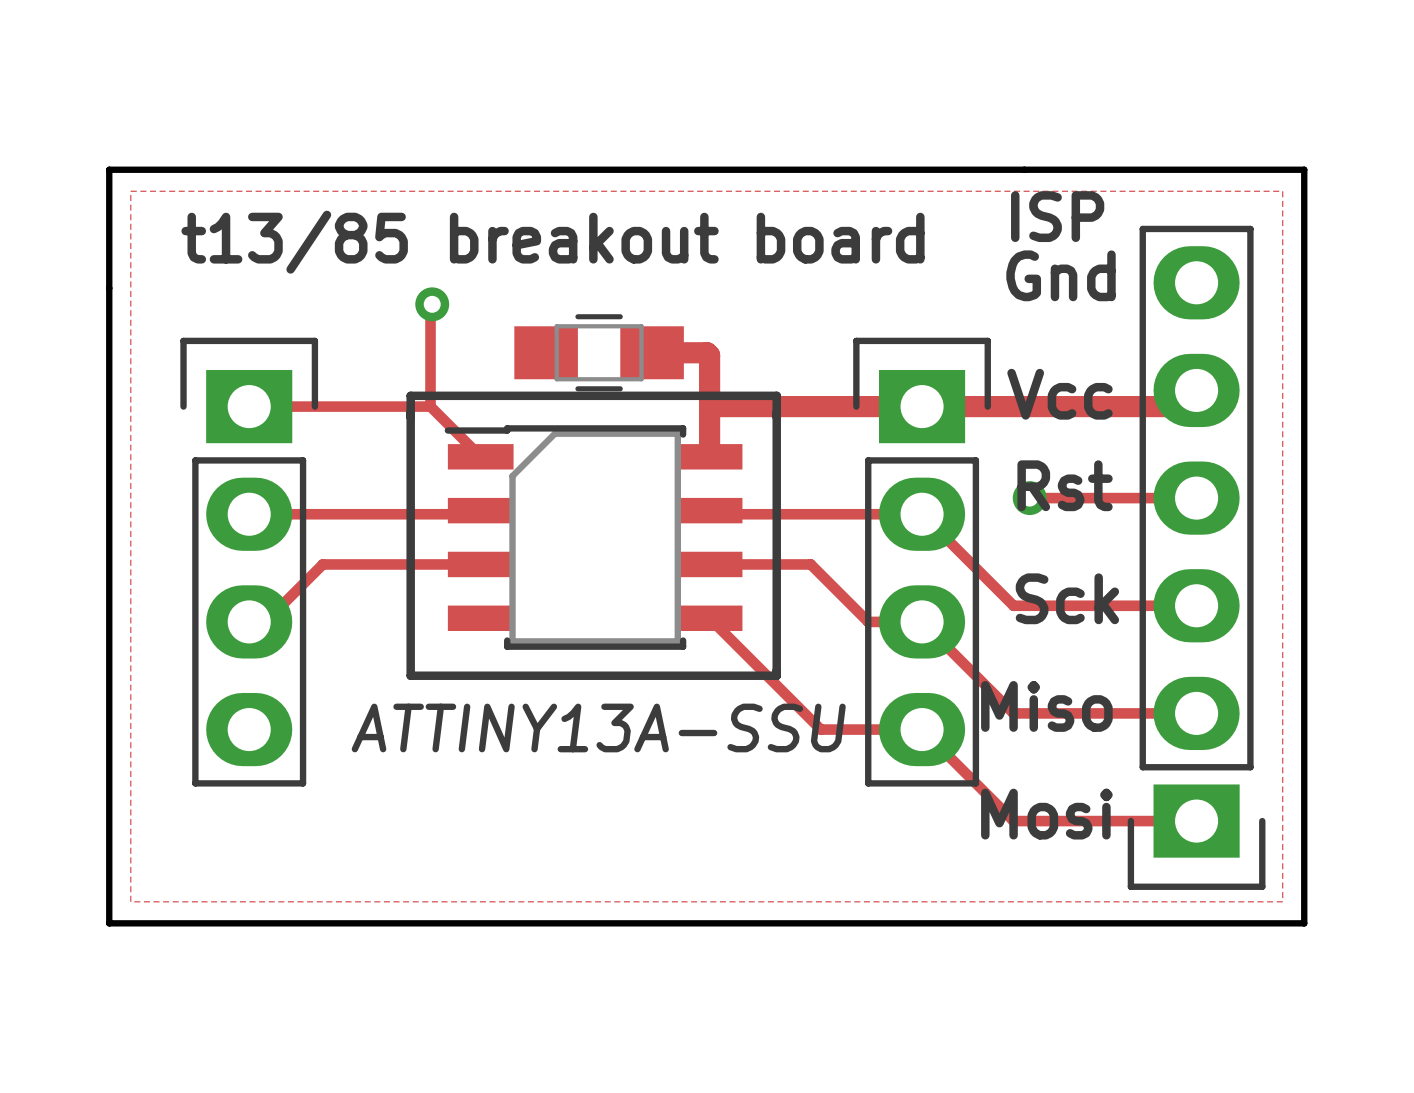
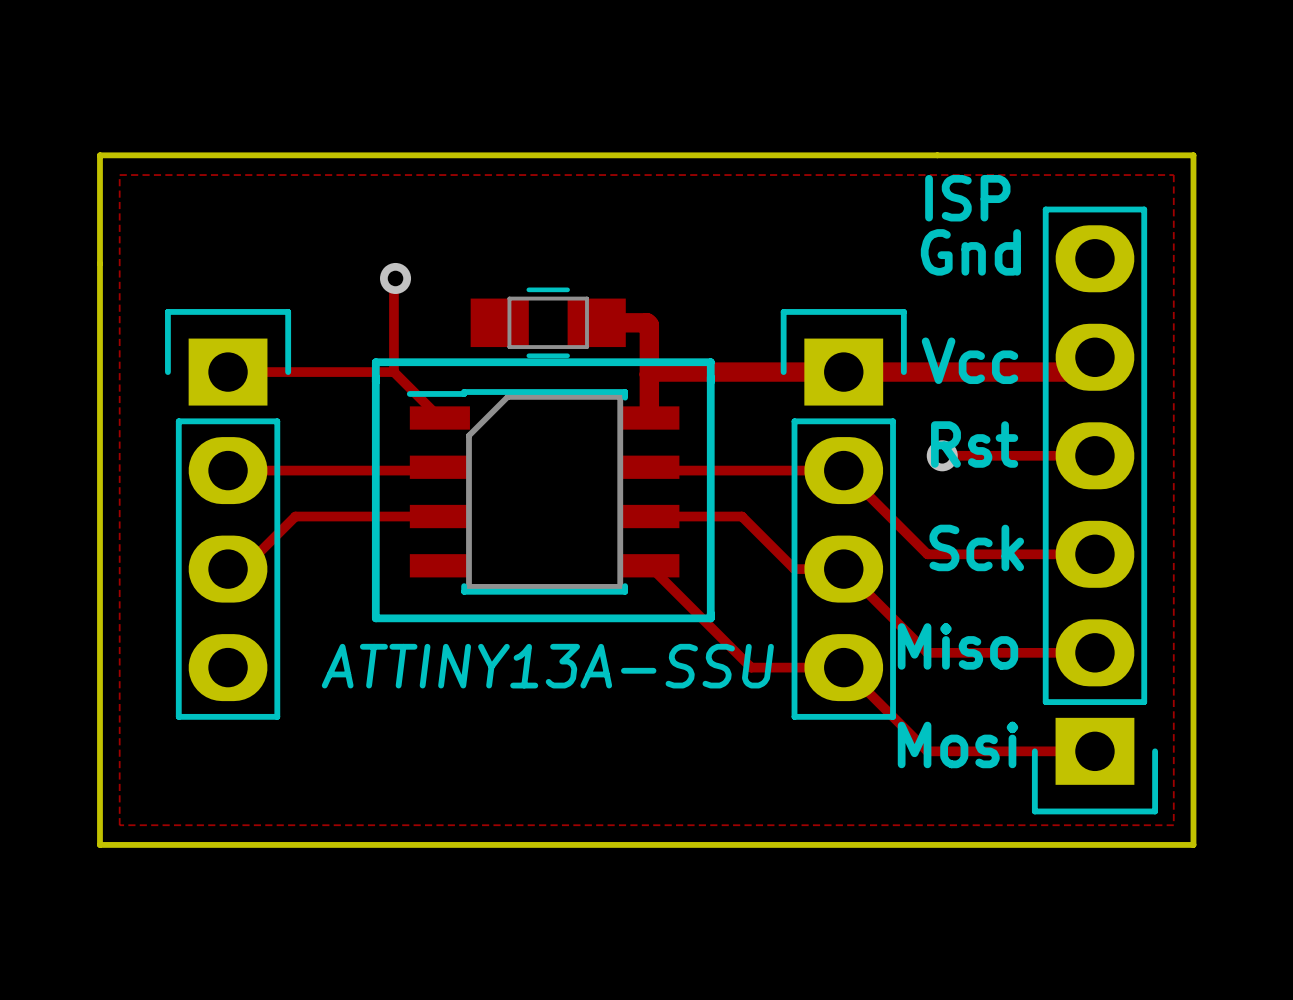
text: t13/85 breakout board (553, 242) -> none

